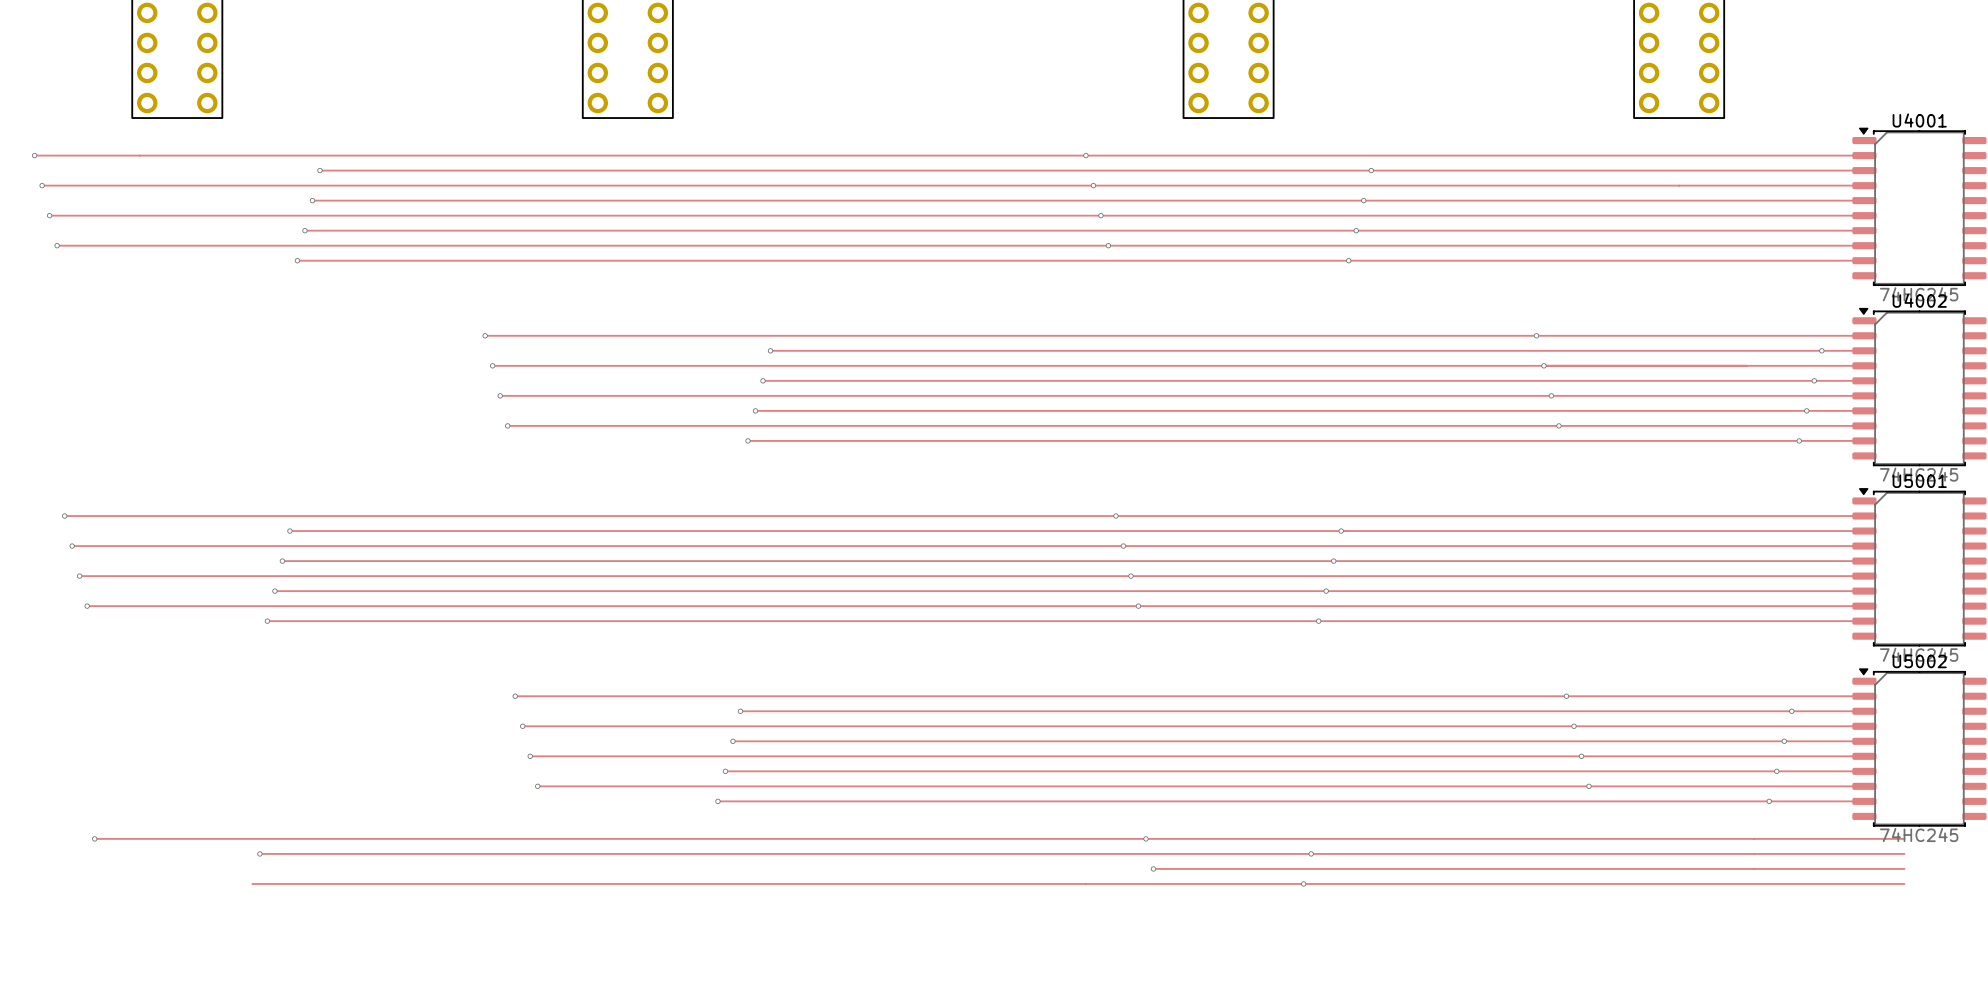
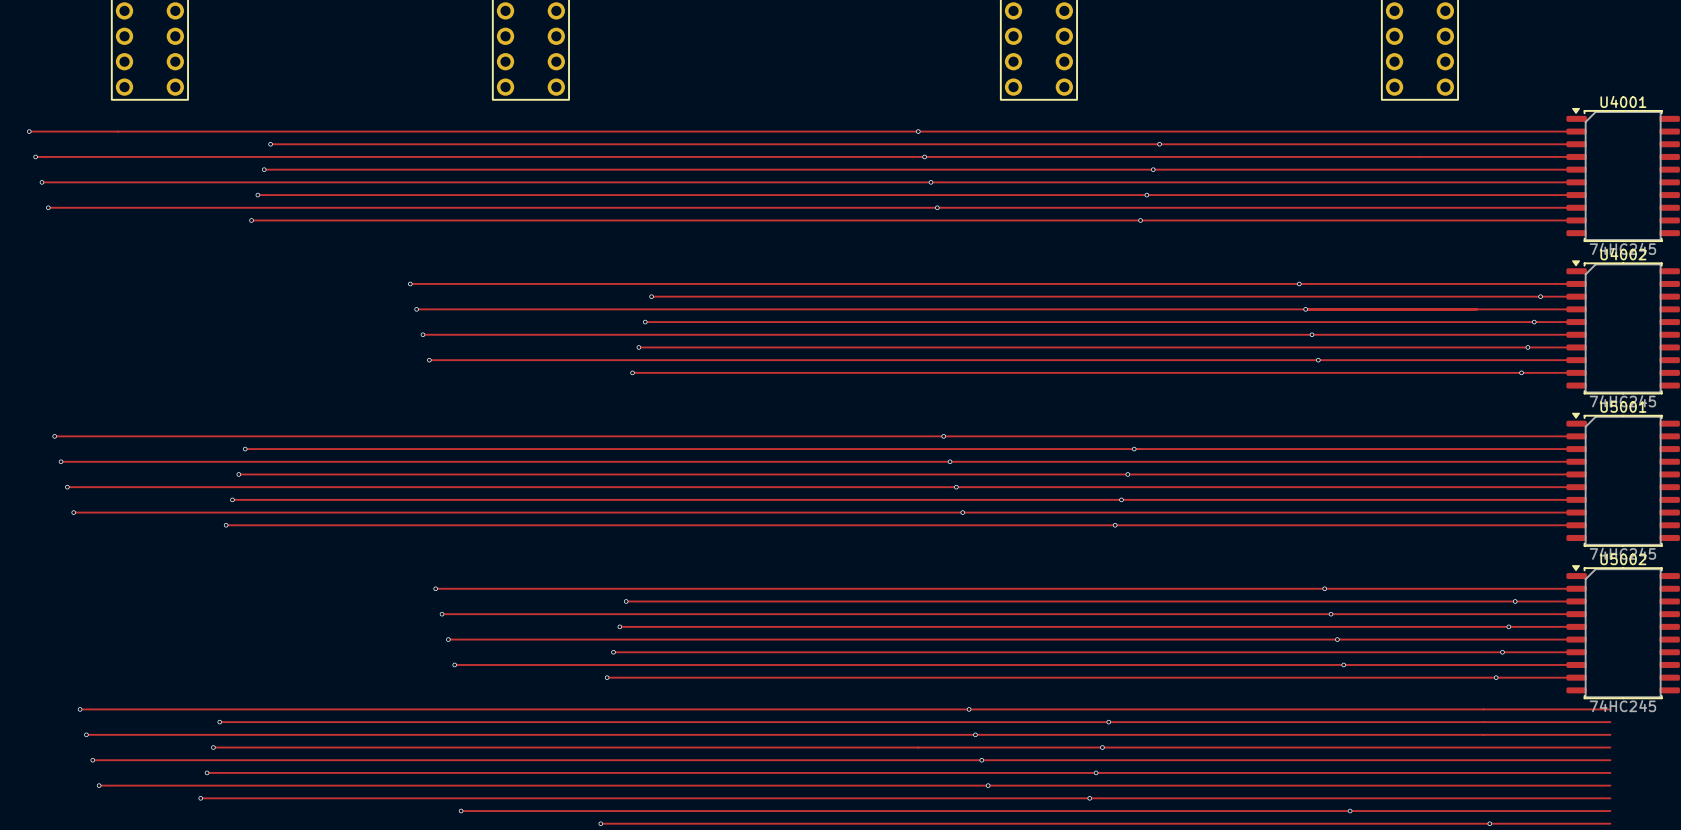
track: none -> (86, 734) (975, 734)
via: none -> (86, 734)
via: none -> (213, 747)
track: none -> (92, 760) (1610, 760)
via: none -> (92, 760)
via: none -> (981, 760)
track: none -> (207, 772) (1610, 772)
via: none -> (207, 772)
via: none -> (1096, 772)
track: none -> (99, 785) (1610, 785)
via: none -> (99, 785)
via: none -> (988, 785)
track: none -> (200, 798) (1610, 798)
via: none -> (200, 798)
via: none -> (1089, 798)
track: none -> (461, 811) (1610, 811)
via: none -> (461, 811)
via: none -> (1350, 811)
track: none -> (600, 823) (1610, 823)
via: none -> (600, 823)
via: none -> (1489, 823)

